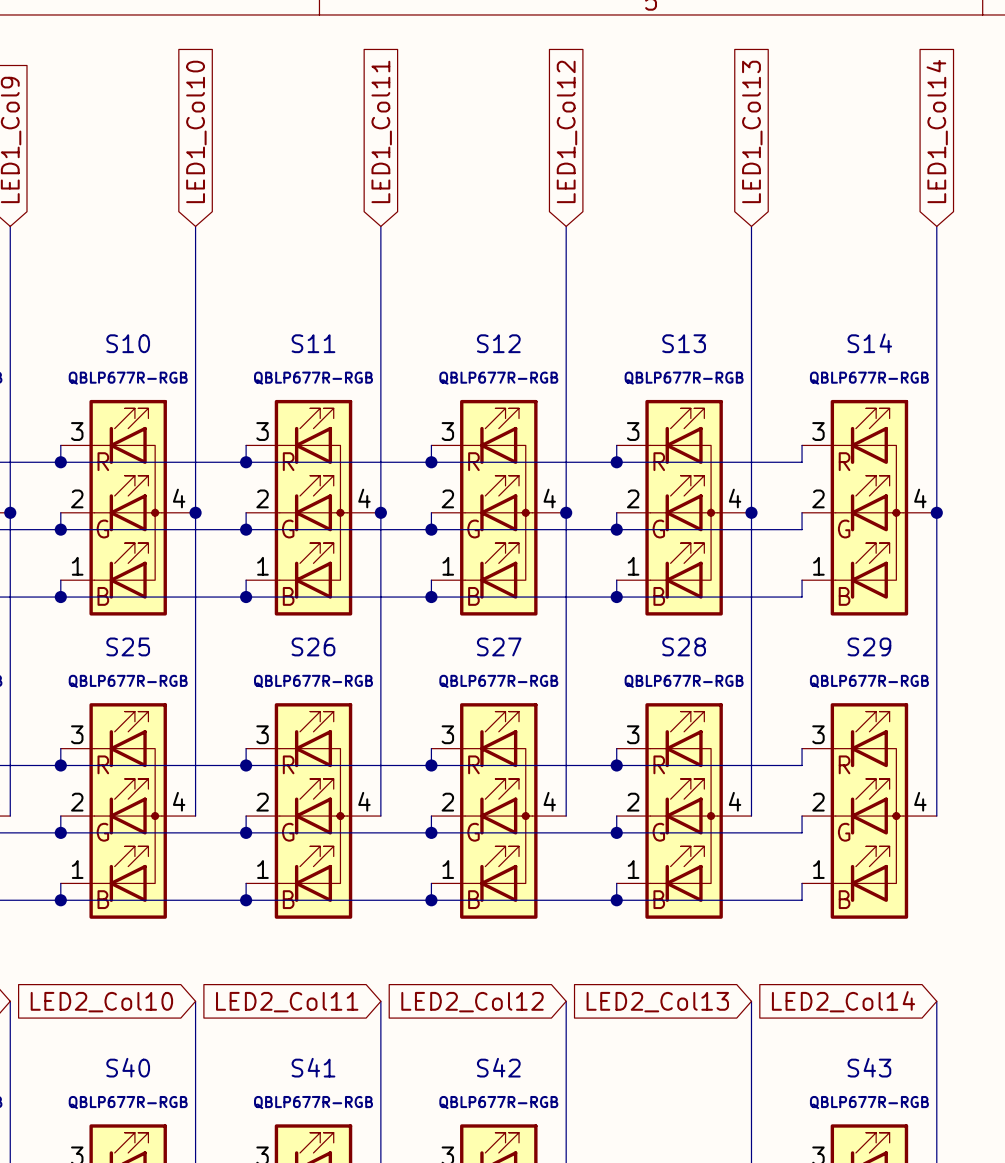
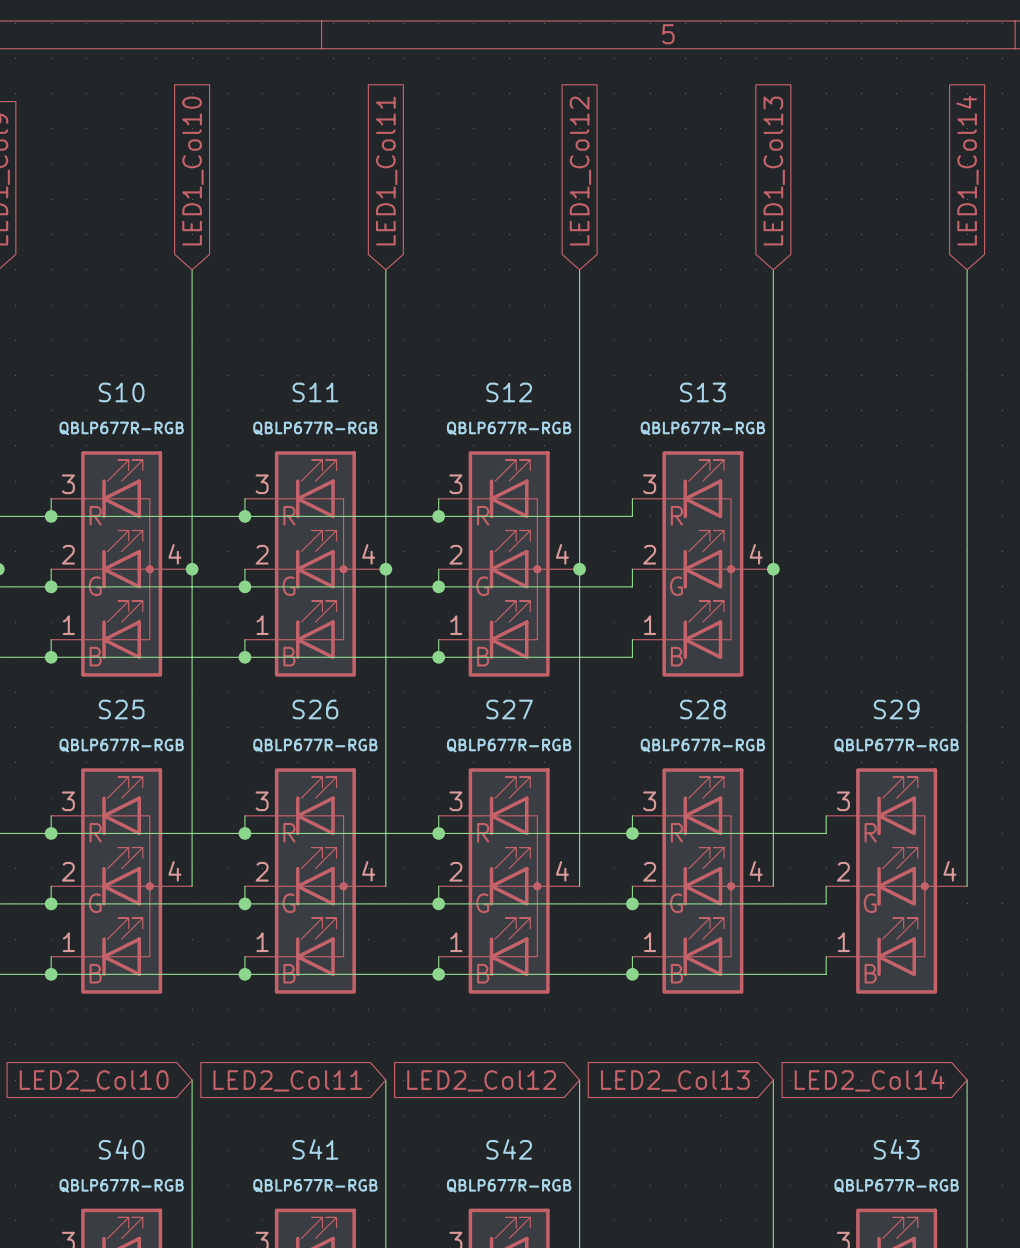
wire: (802, 445) (802, 462) (616, 462) -> none
junction: (616, 462) -> none
S14: QBLP677R-RGB (869, 507) -> none
wire: (802, 512) (802, 529) (616, 529) -> none
junction: (936, 512) -> none
junction: (616, 529) -> none
wire: (802, 580) (802, 597) (616, 597) -> none
junction: (616, 597) -> none

